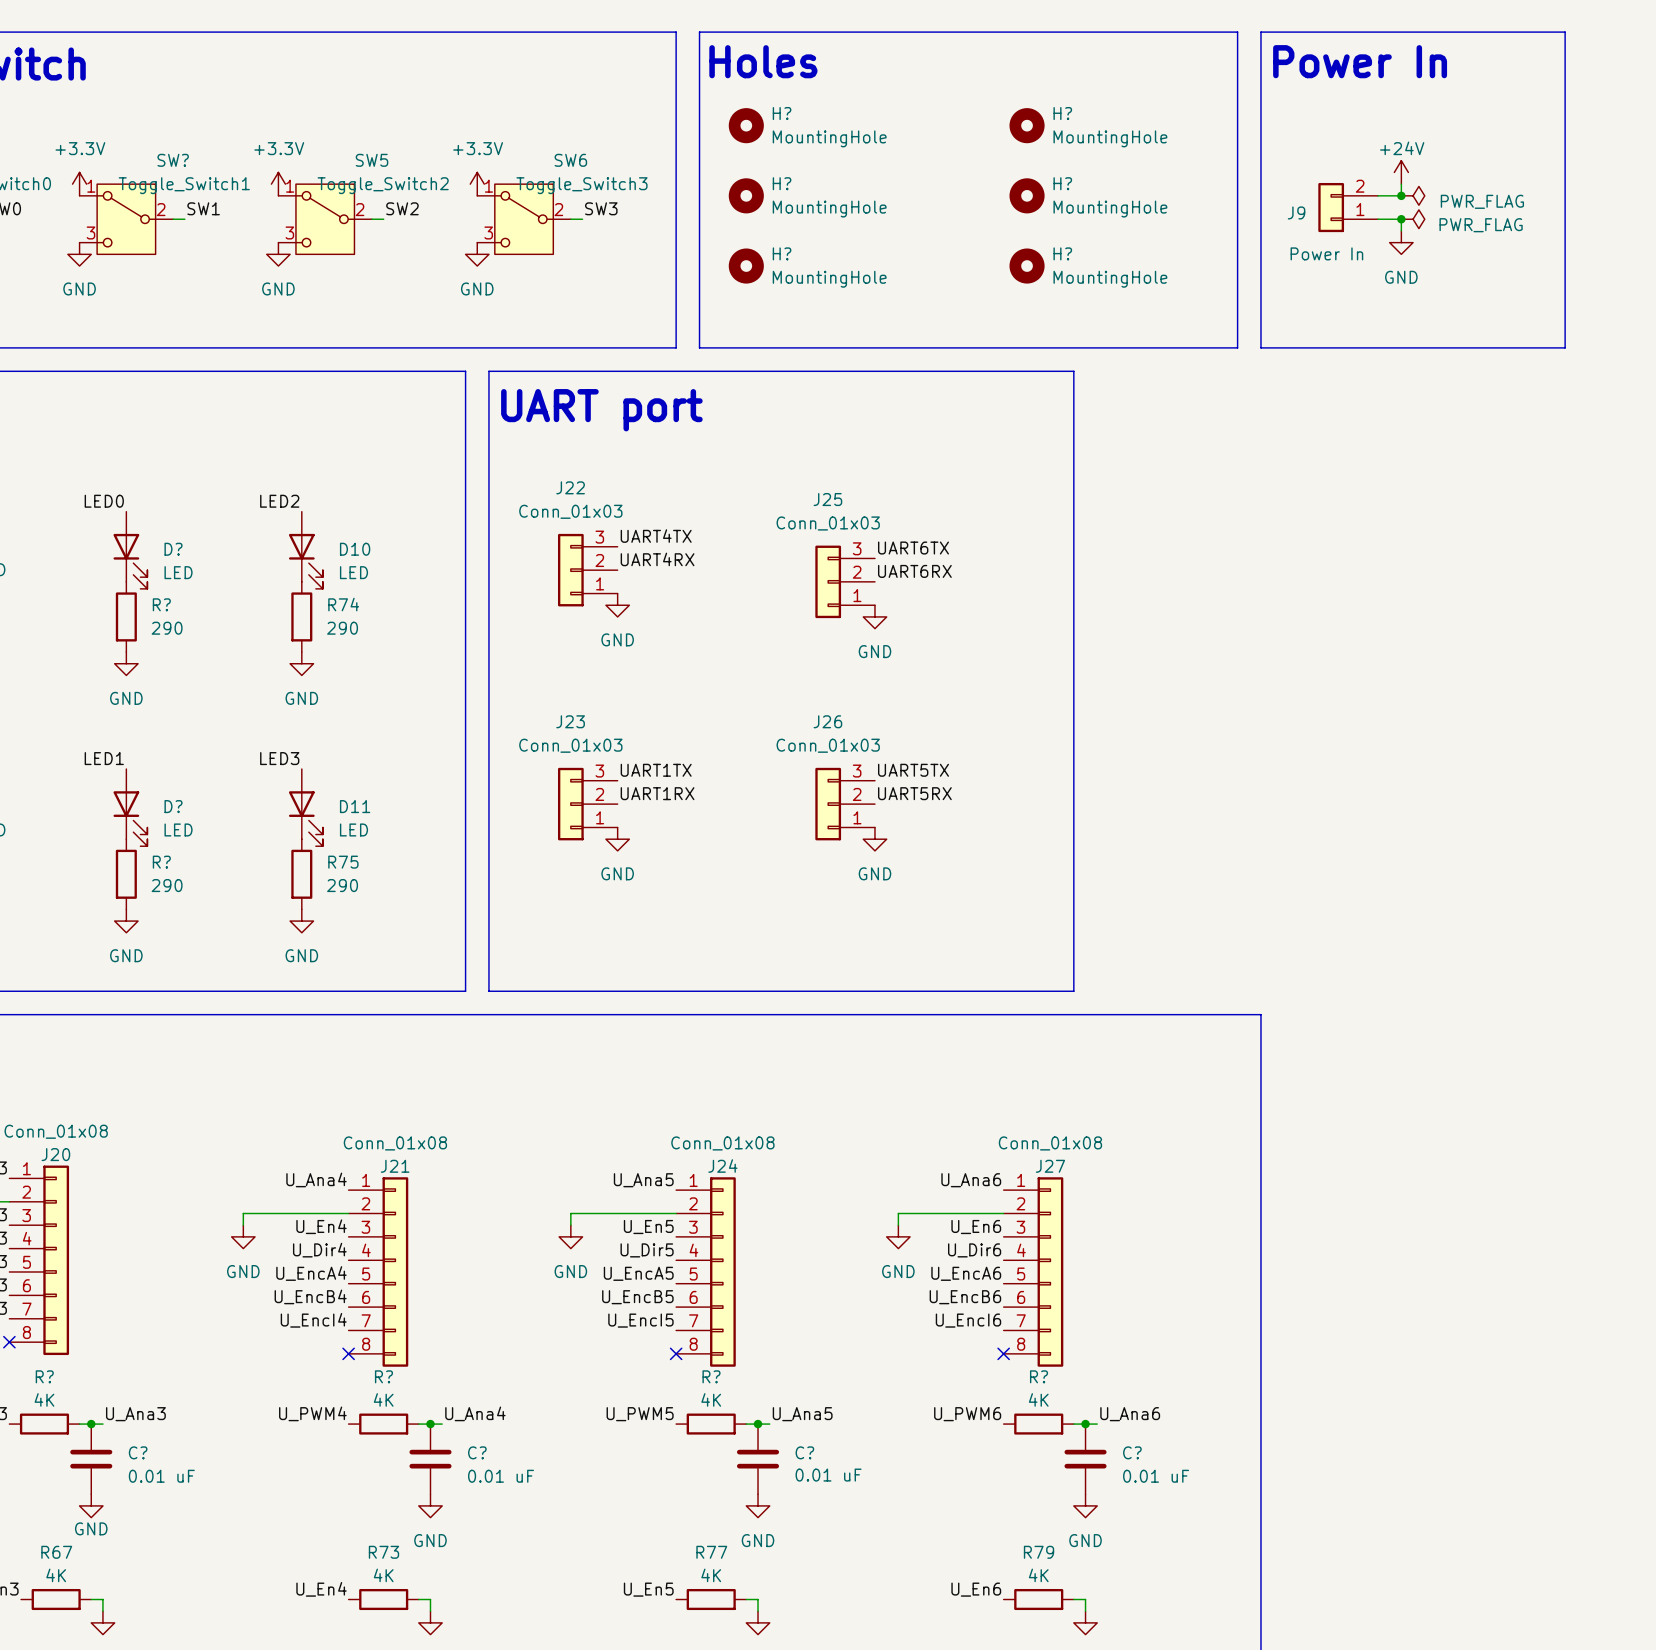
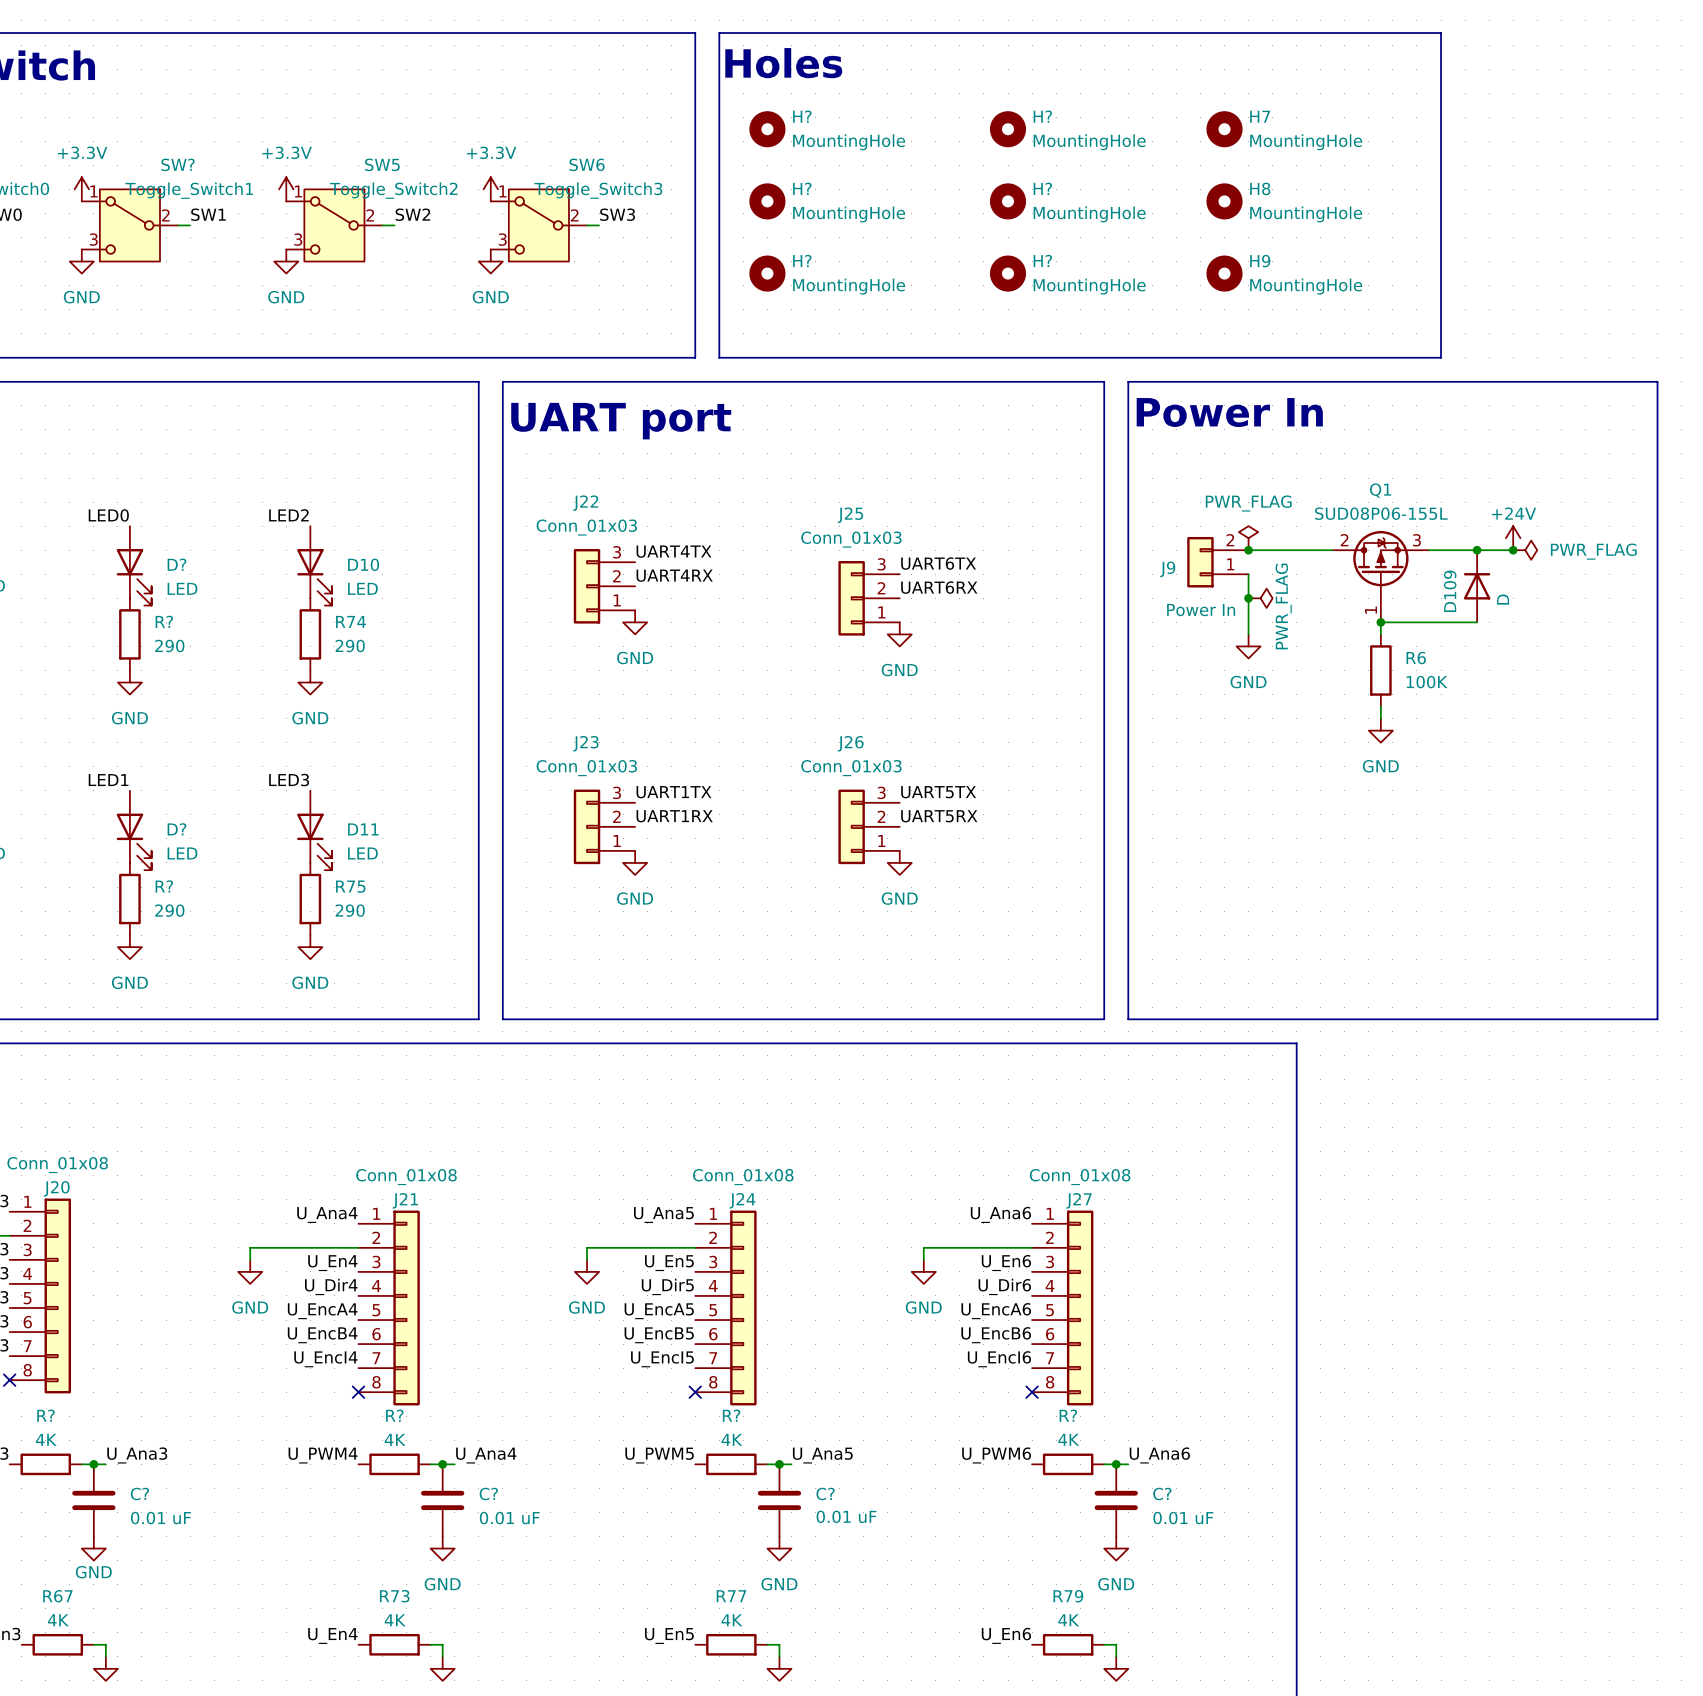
line: (1237, 32) (1237, 347) -> (1272, 32) (1296, 32)
line: (1260, 32) (1260, 347) -> (1272, 357) (1296, 357)
line: (1401, 32) (1565, 32) (1565, 347) (1401, 347) -> (1441, 32) (1441, 357)
text: Power In (1360, 61) -> none
H?: none -> MountingHole (1008, 129)
H?: MountingHole (1027, 125) -> none
H7: none -> MountingHole (1224, 129)
power symbol: +24V (1401, 172) -> none
wire: (1401, 184) (1401, 195) (1377, 195) -> none
H?: none -> MountingHole (1008, 201)
H?: MountingHole (1027, 195) -> none
H8: none -> MountingHole (1224, 201)
junction: (1401, 195) -> none
power symbol: PWR_FLAG (1413, 195) -> none
J9 position: (1348, 207) -> (1217, 562)
wire: (1377, 219) (1401, 219) (1401, 230) -> none
junction: (1401, 219) -> none
power symbol: PWR_FLAG (1413, 219) -> none
power symbol: GND (1401, 242) -> none
H?: none -> MountingHole (1008, 273)
H?: MountingHole (1027, 266) -> none
H9: none -> MountingHole (1224, 273)
line: none -> (1128, 381) (1657, 381) (1657, 1019) (1128, 1019) (1128, 381)
text: none -> Power In (1229, 412)
power symbol: none -> PWR_FLAG (1248, 538)
power symbol: none -> +24V (1513, 538)
wire: none -> (1248, 550) (1332, 550)
junction: none -> (1248, 550)
wire: none -> (1428, 550) (1513, 550)
junction: none -> (1477, 550)
junction: none -> (1513, 550)
power symbol: none -> PWR_FLAG (1525, 550)
wire: none -> (1248, 574) (1248, 634)
Q1: none -> SUD08P06-155L (1380, 576)
D109: none -> D (1477, 586)
junction: none -> (1248, 598)
power symbol: none -> PWR_FLAG (1260, 598)
junction: none -> (1380, 622)
wire: none -> (1477, 622) (1380, 622) (1380, 634)
power symbol: none -> GND (1248, 646)
R6: none -> 100K (1380, 670)
wire: none -> (1380, 706) (1380, 718)
power symbol: none -> GND (1380, 730)

